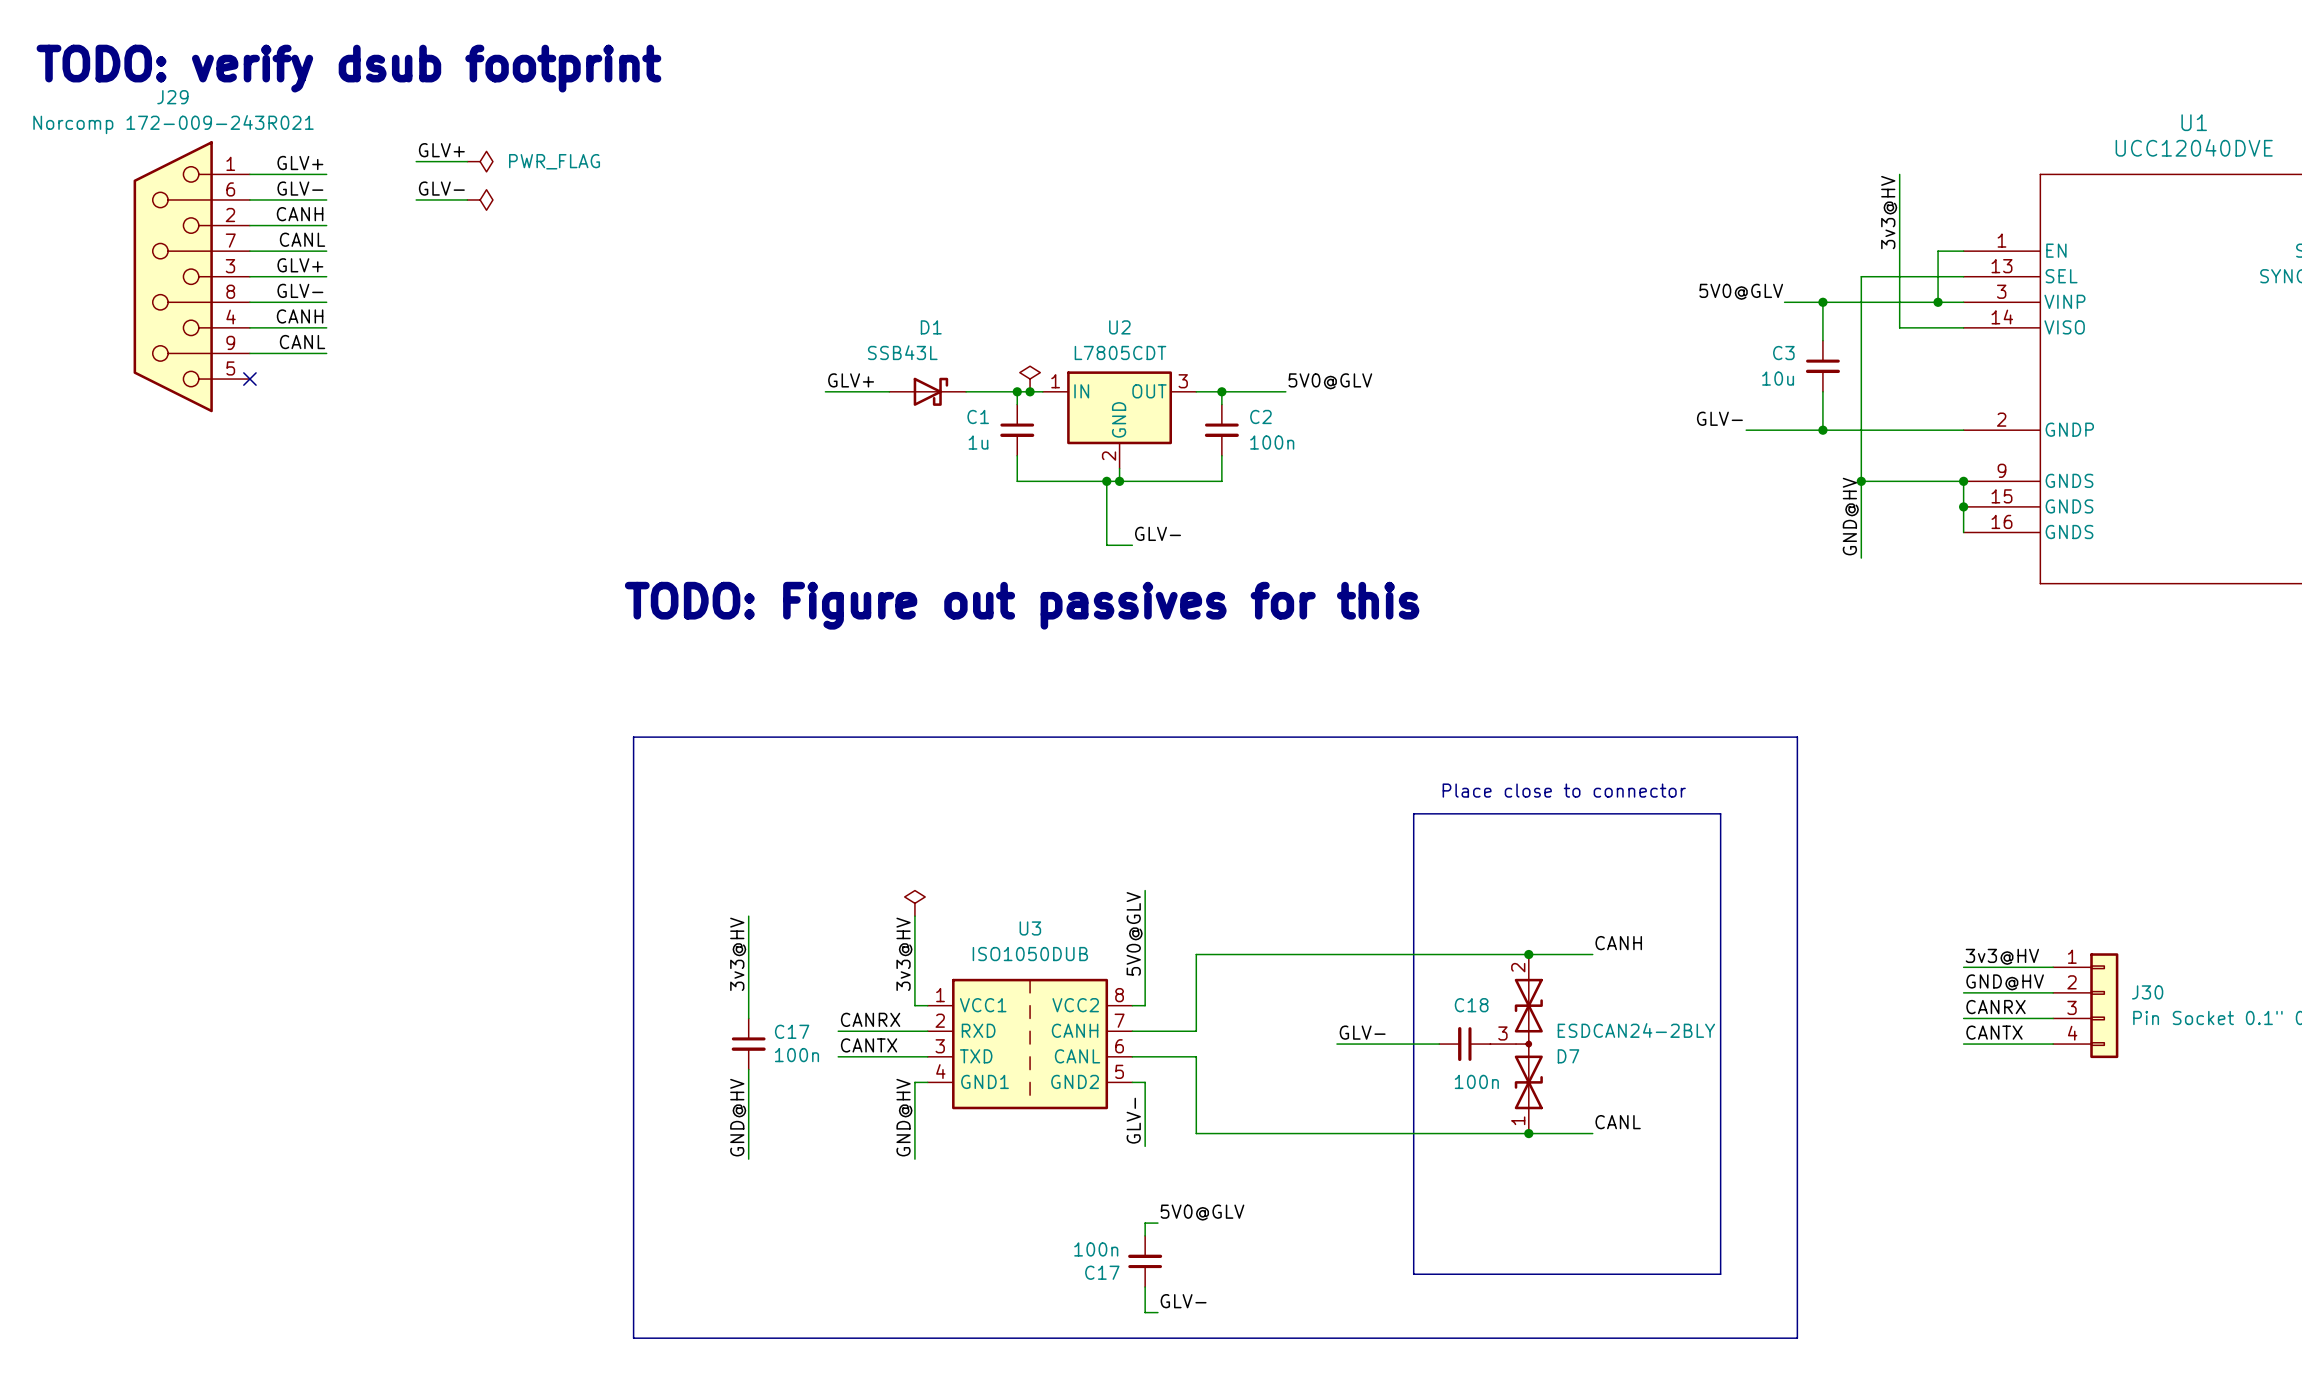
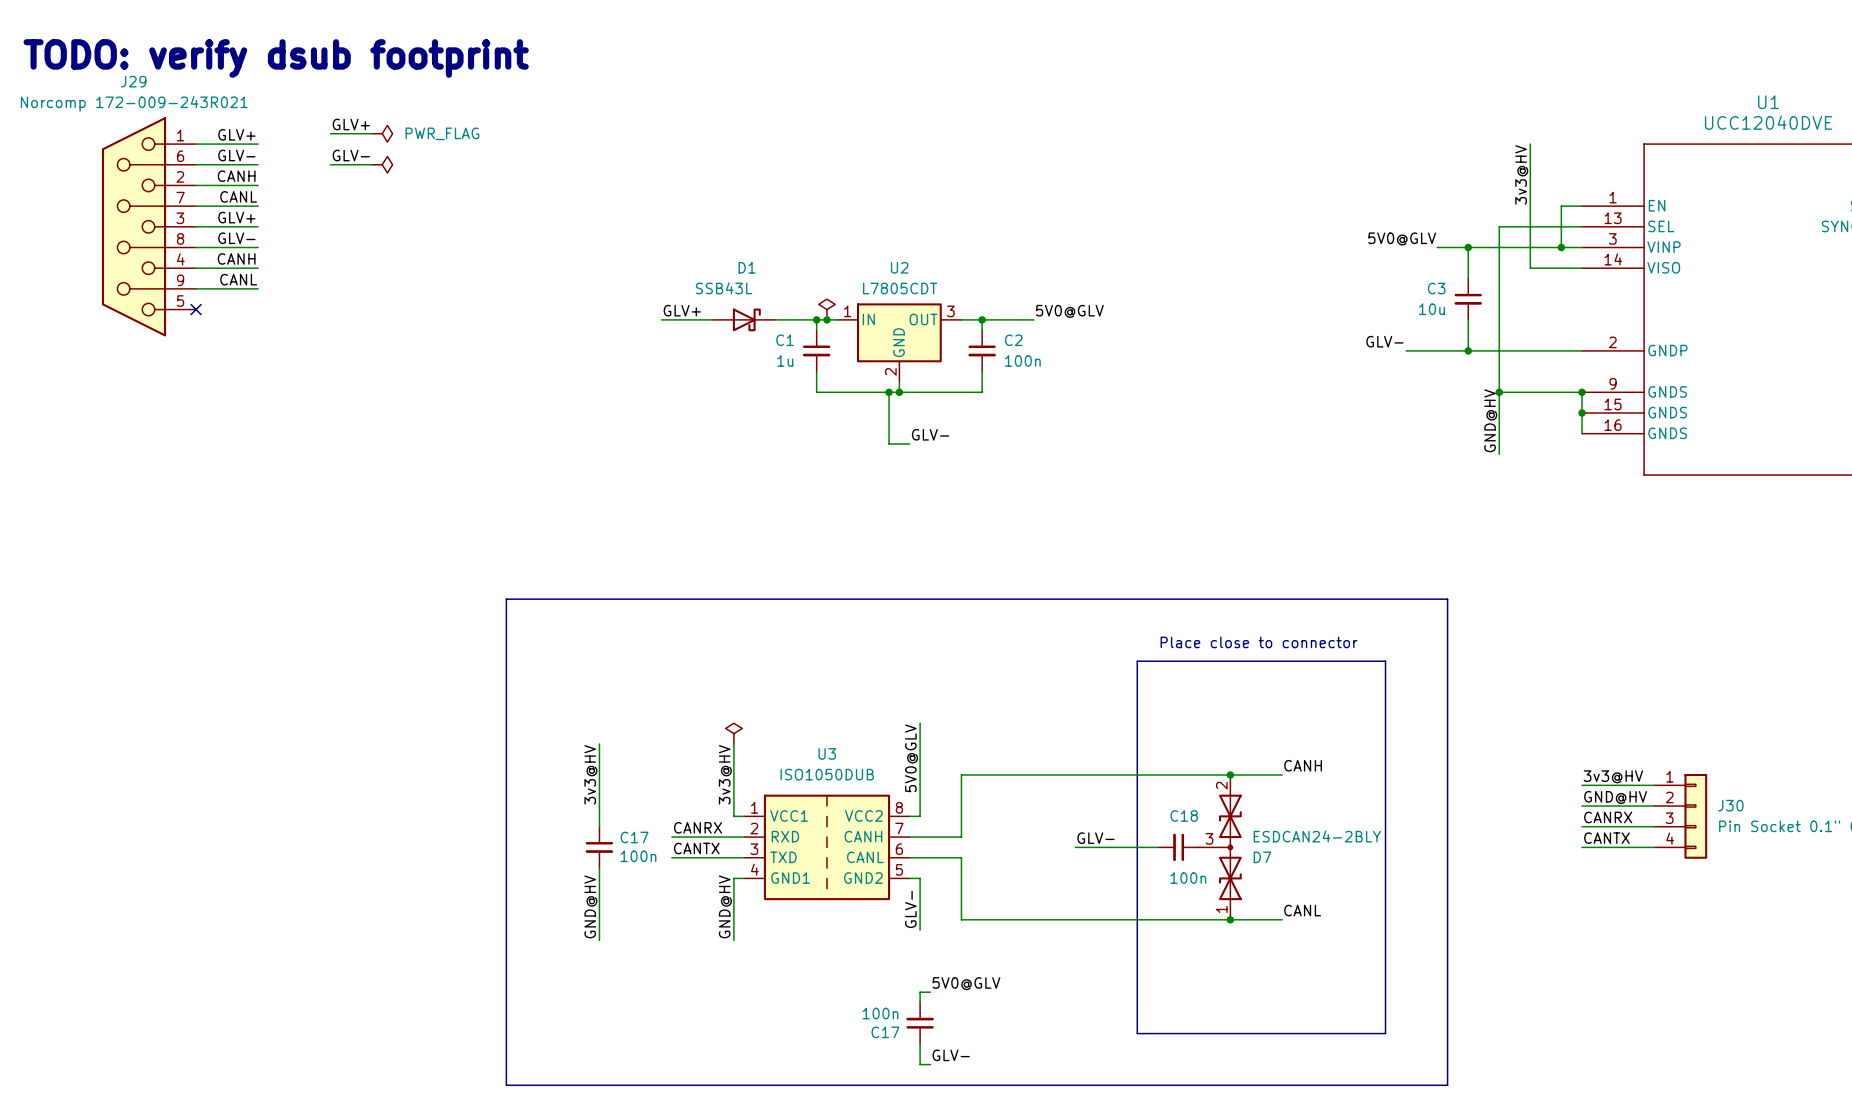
text: TODO: Figure out passives for this (1022, 605) -> none

